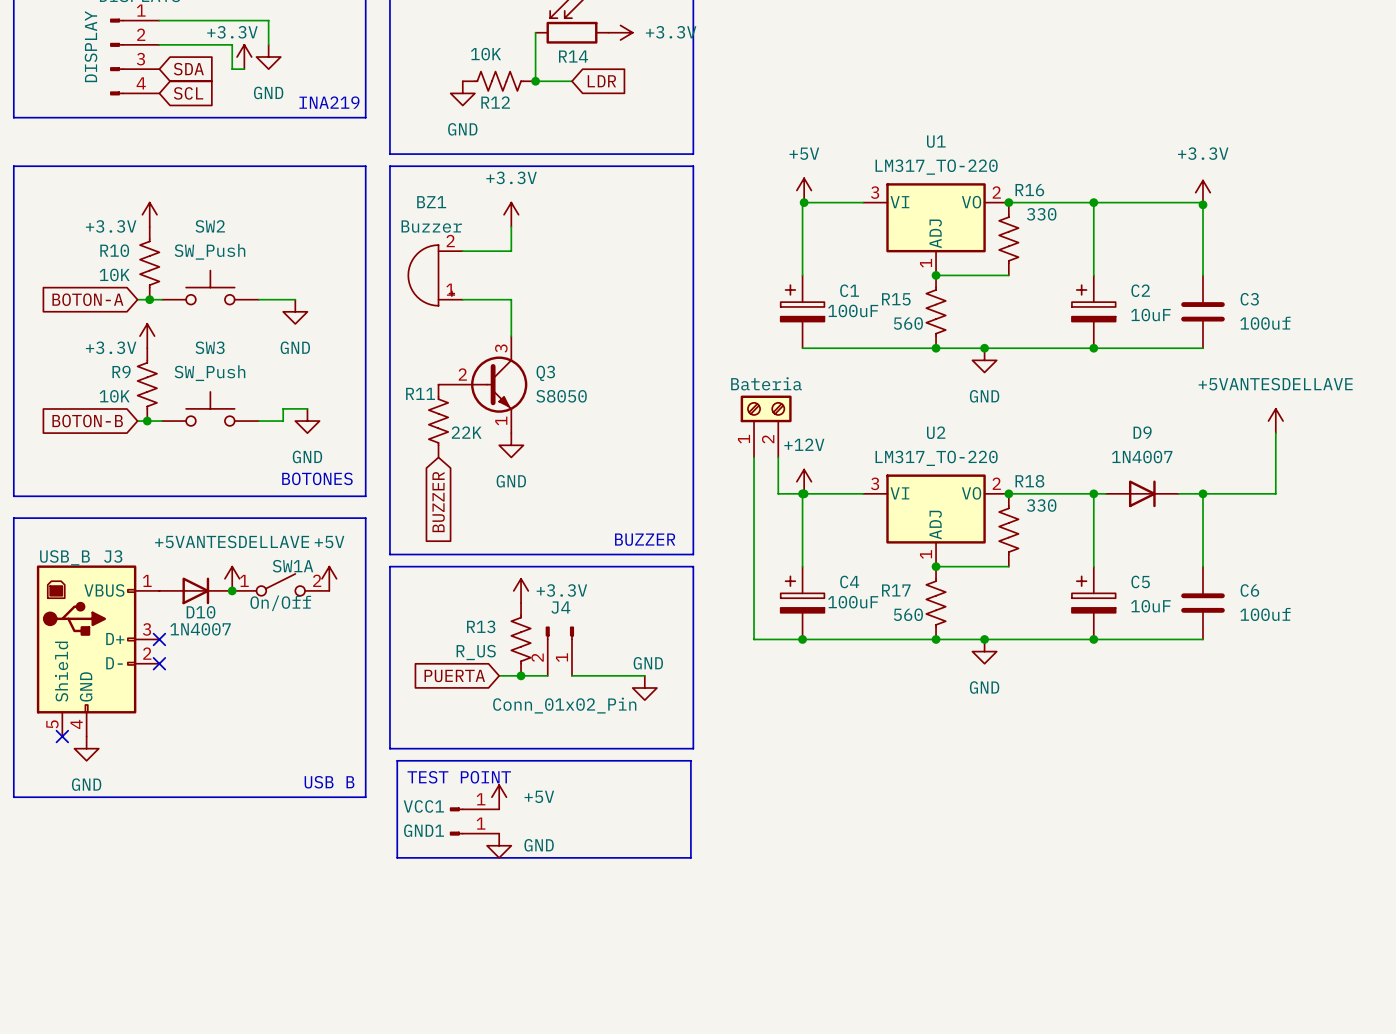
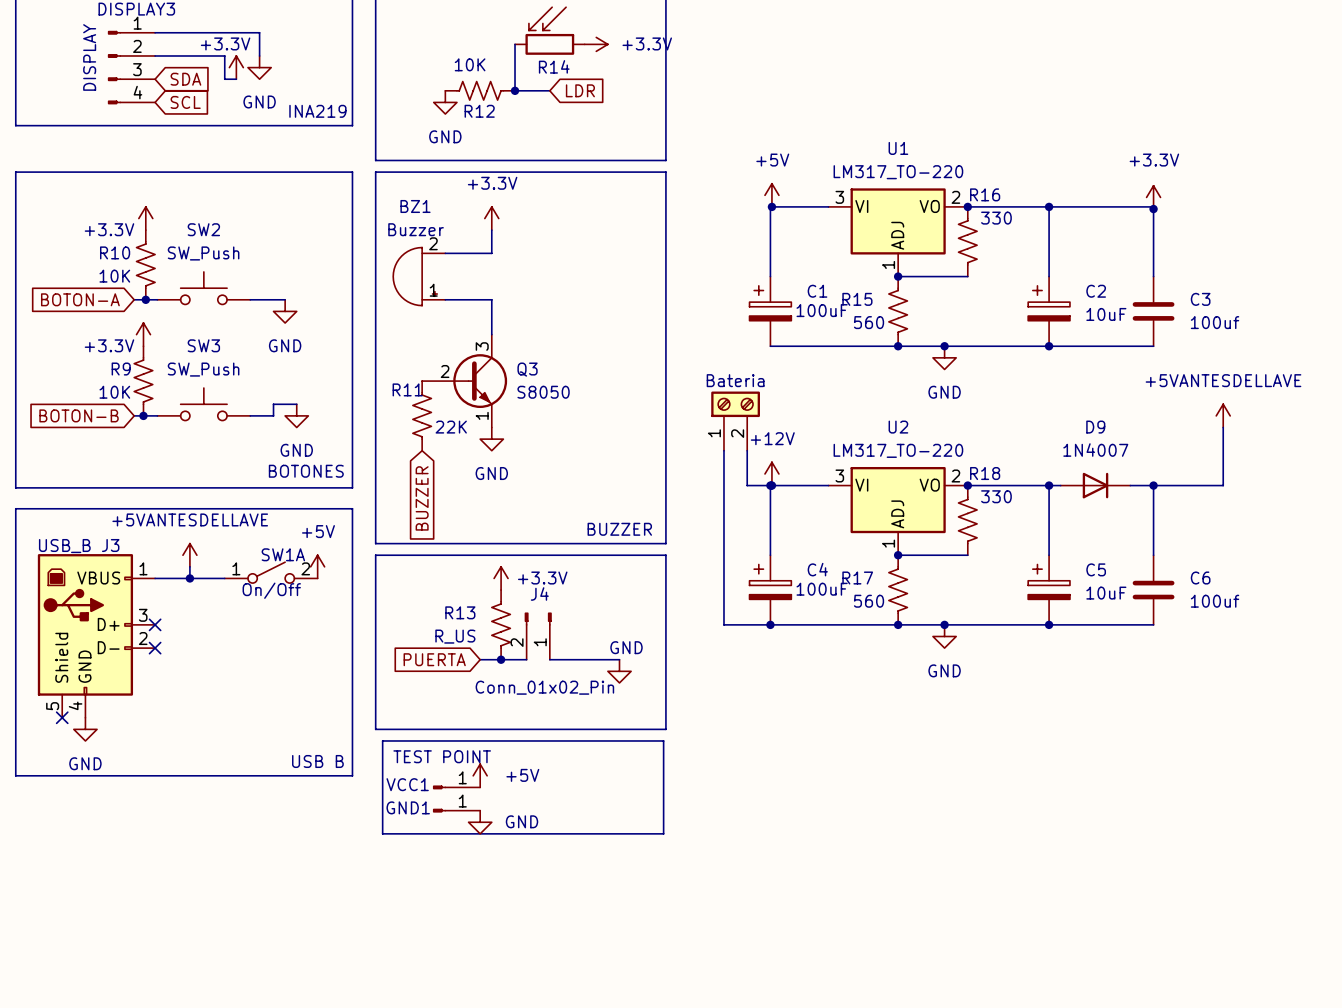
wire: none -> (189, 566) (189, 578)
power symbol position: +5VANTESDELLAVE (232, 578) -> +5VANTESDELLAVE (189, 555)
D10: 1N4007 (195, 590) -> none
junction position: (232, 590) -> (189, 578)

